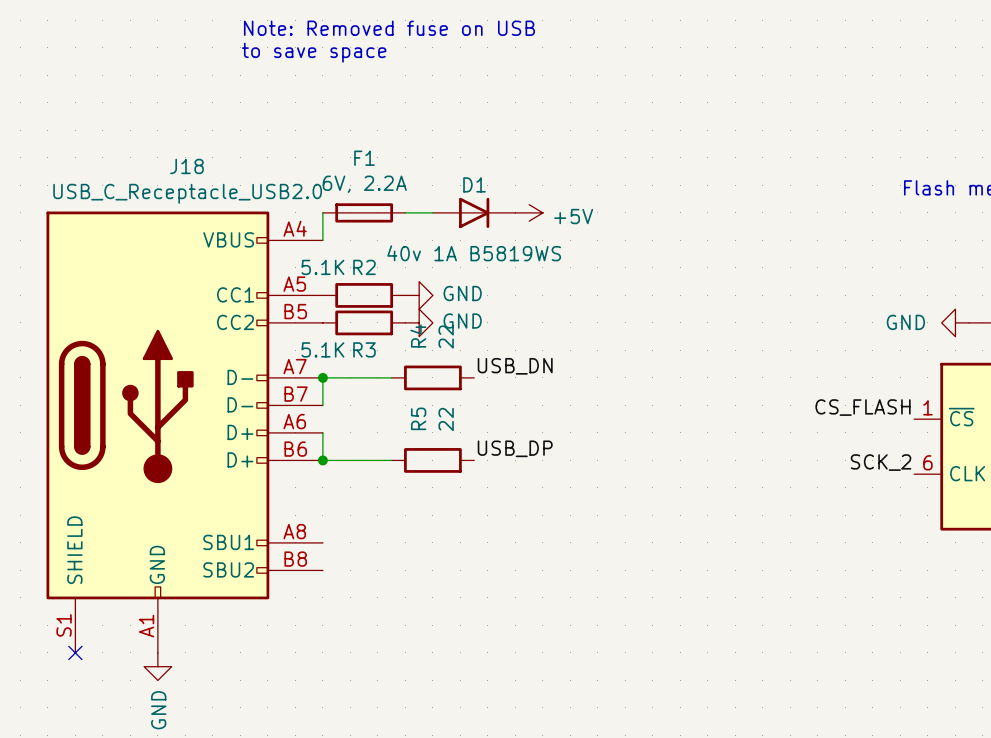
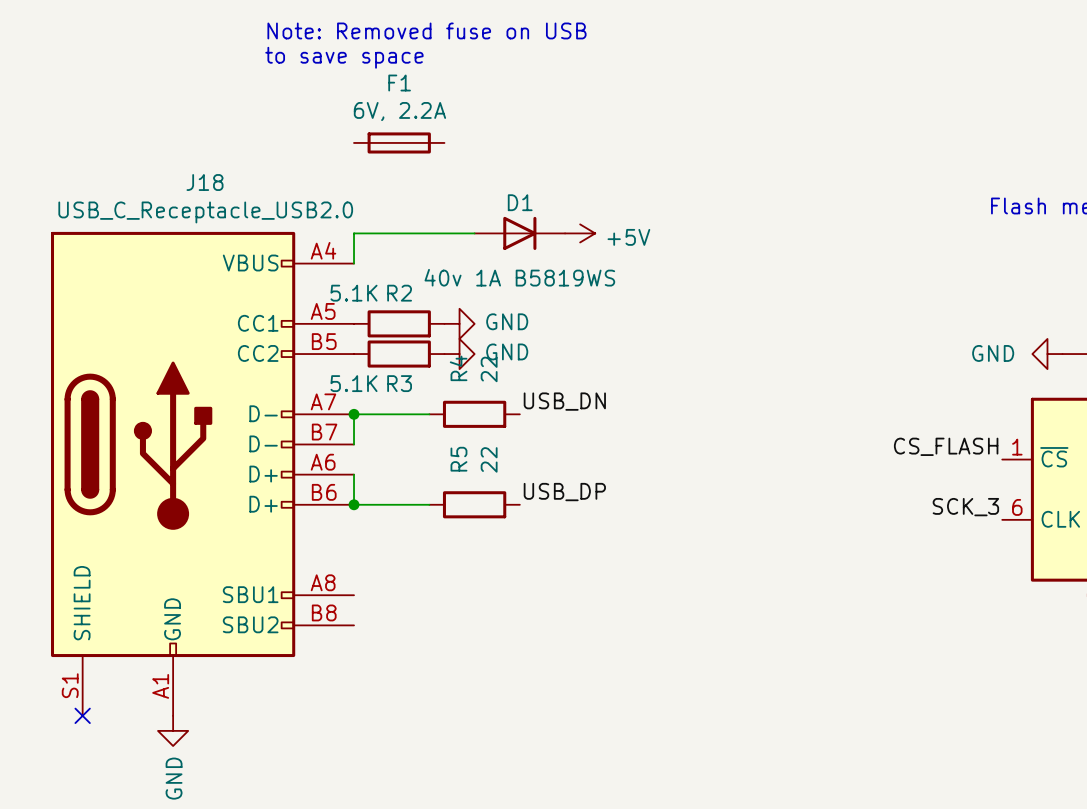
F1 position: (364, 212) -> (399, 142)
label: SCK_2 (881, 462) -> SCK_3 (965, 507)

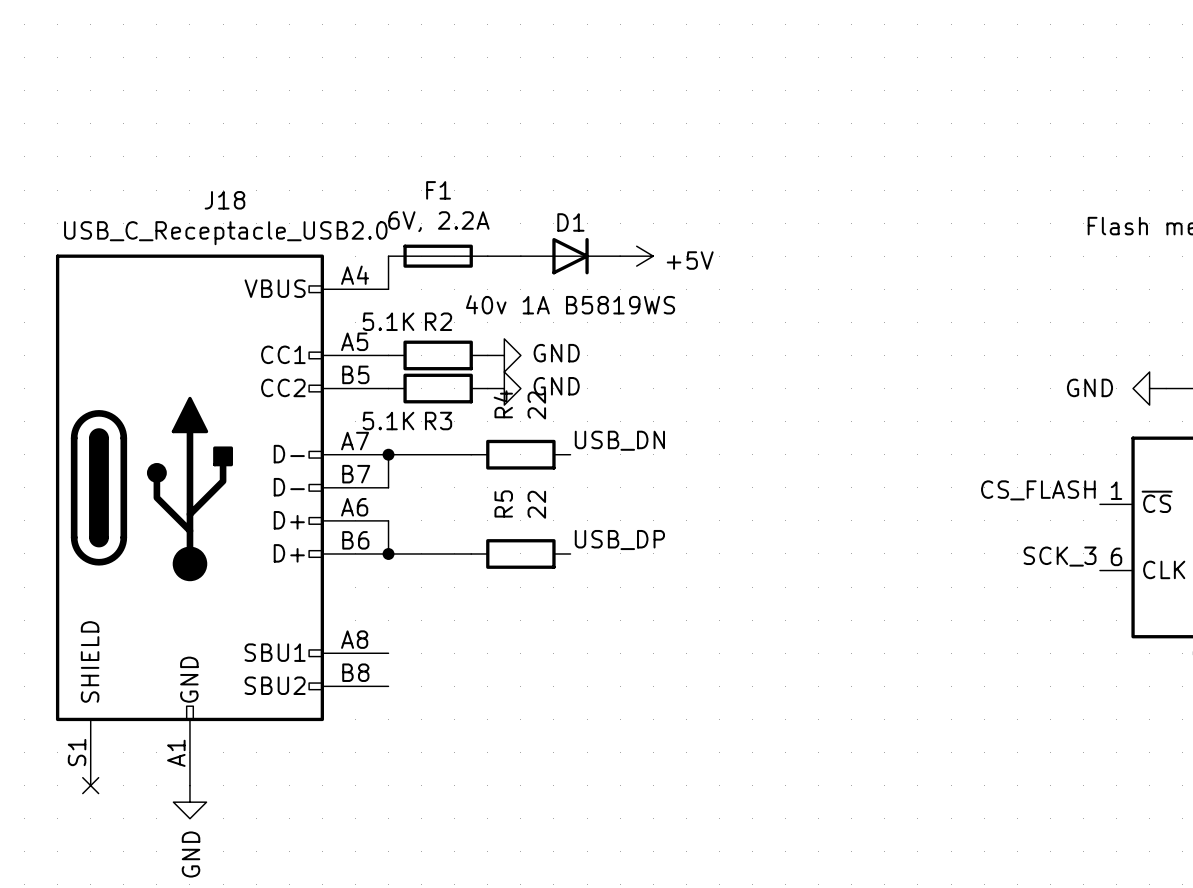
text: Note: Removed fuse on USB (426, 30) -> none
text: to save space (344, 57) -> none
F1 position: (399, 142) -> (438, 256)

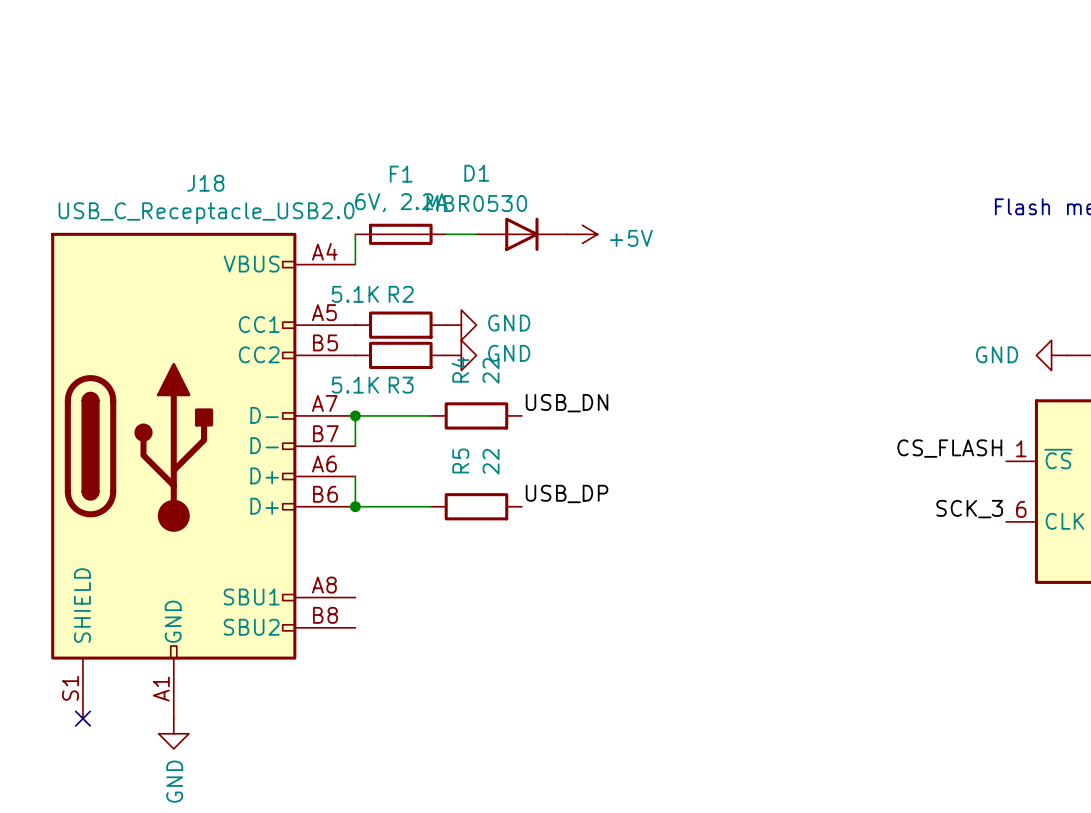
D1 name position: D1 (570, 222) -> D1 (476, 173)
D1 value: 40v 1A B5819WS (570, 304) -> MBR0530 (476, 203)

